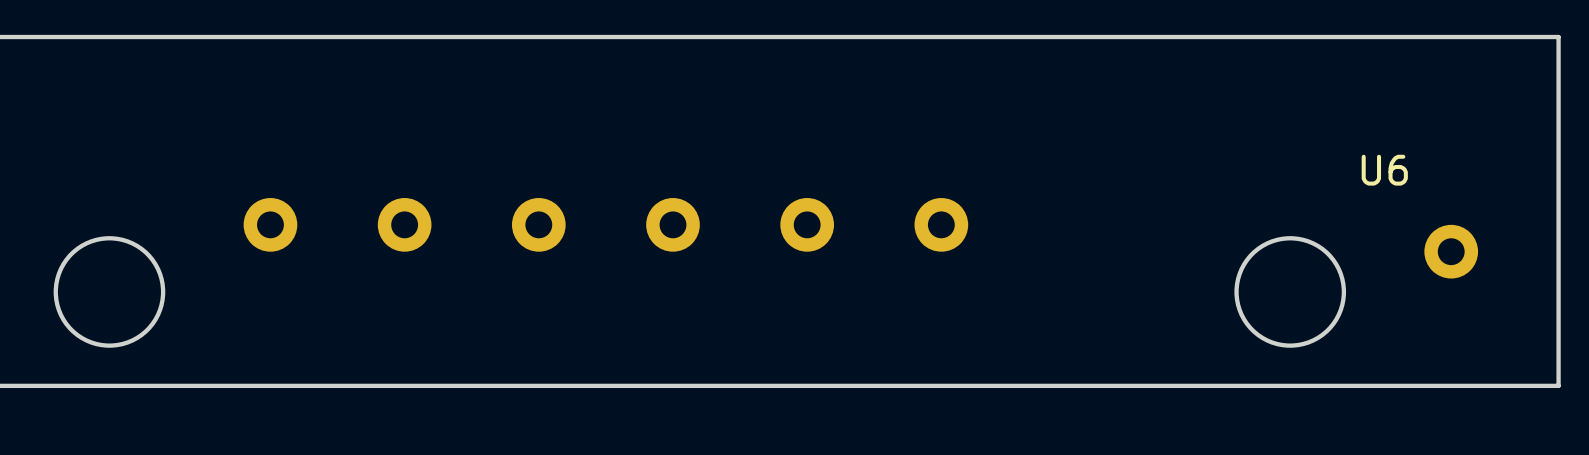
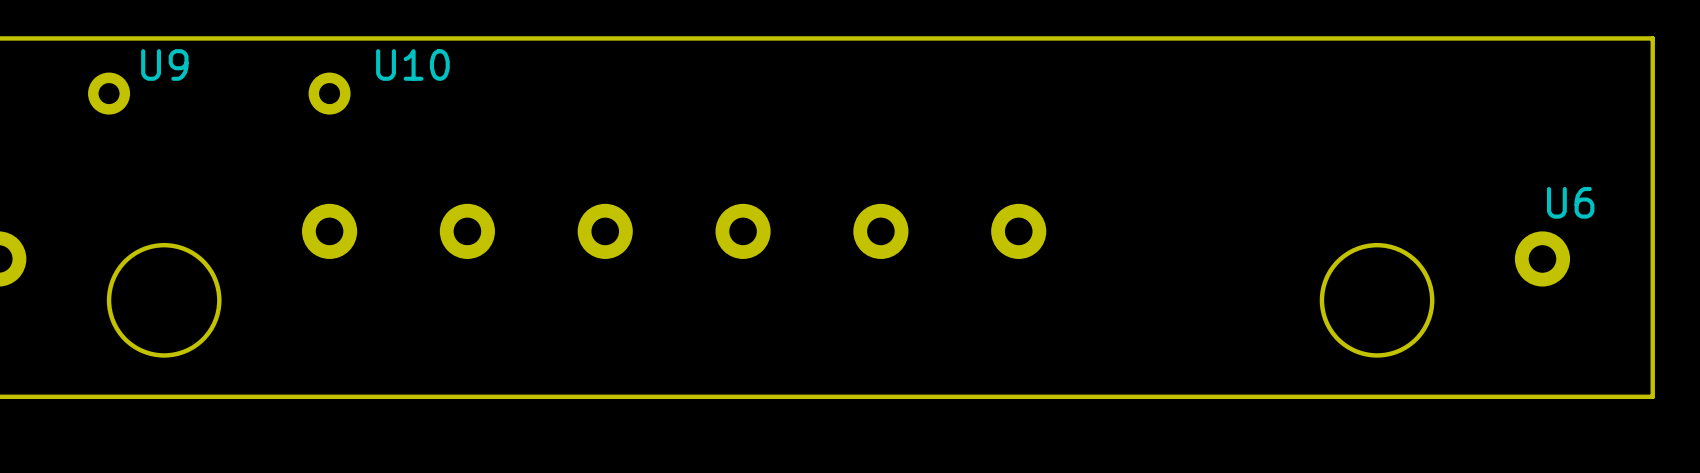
U9: none -> (109, 93)
U10: none -> (329, 93)
U6 name position: U6 (1384, 170) -> U6 (1570, 202)

